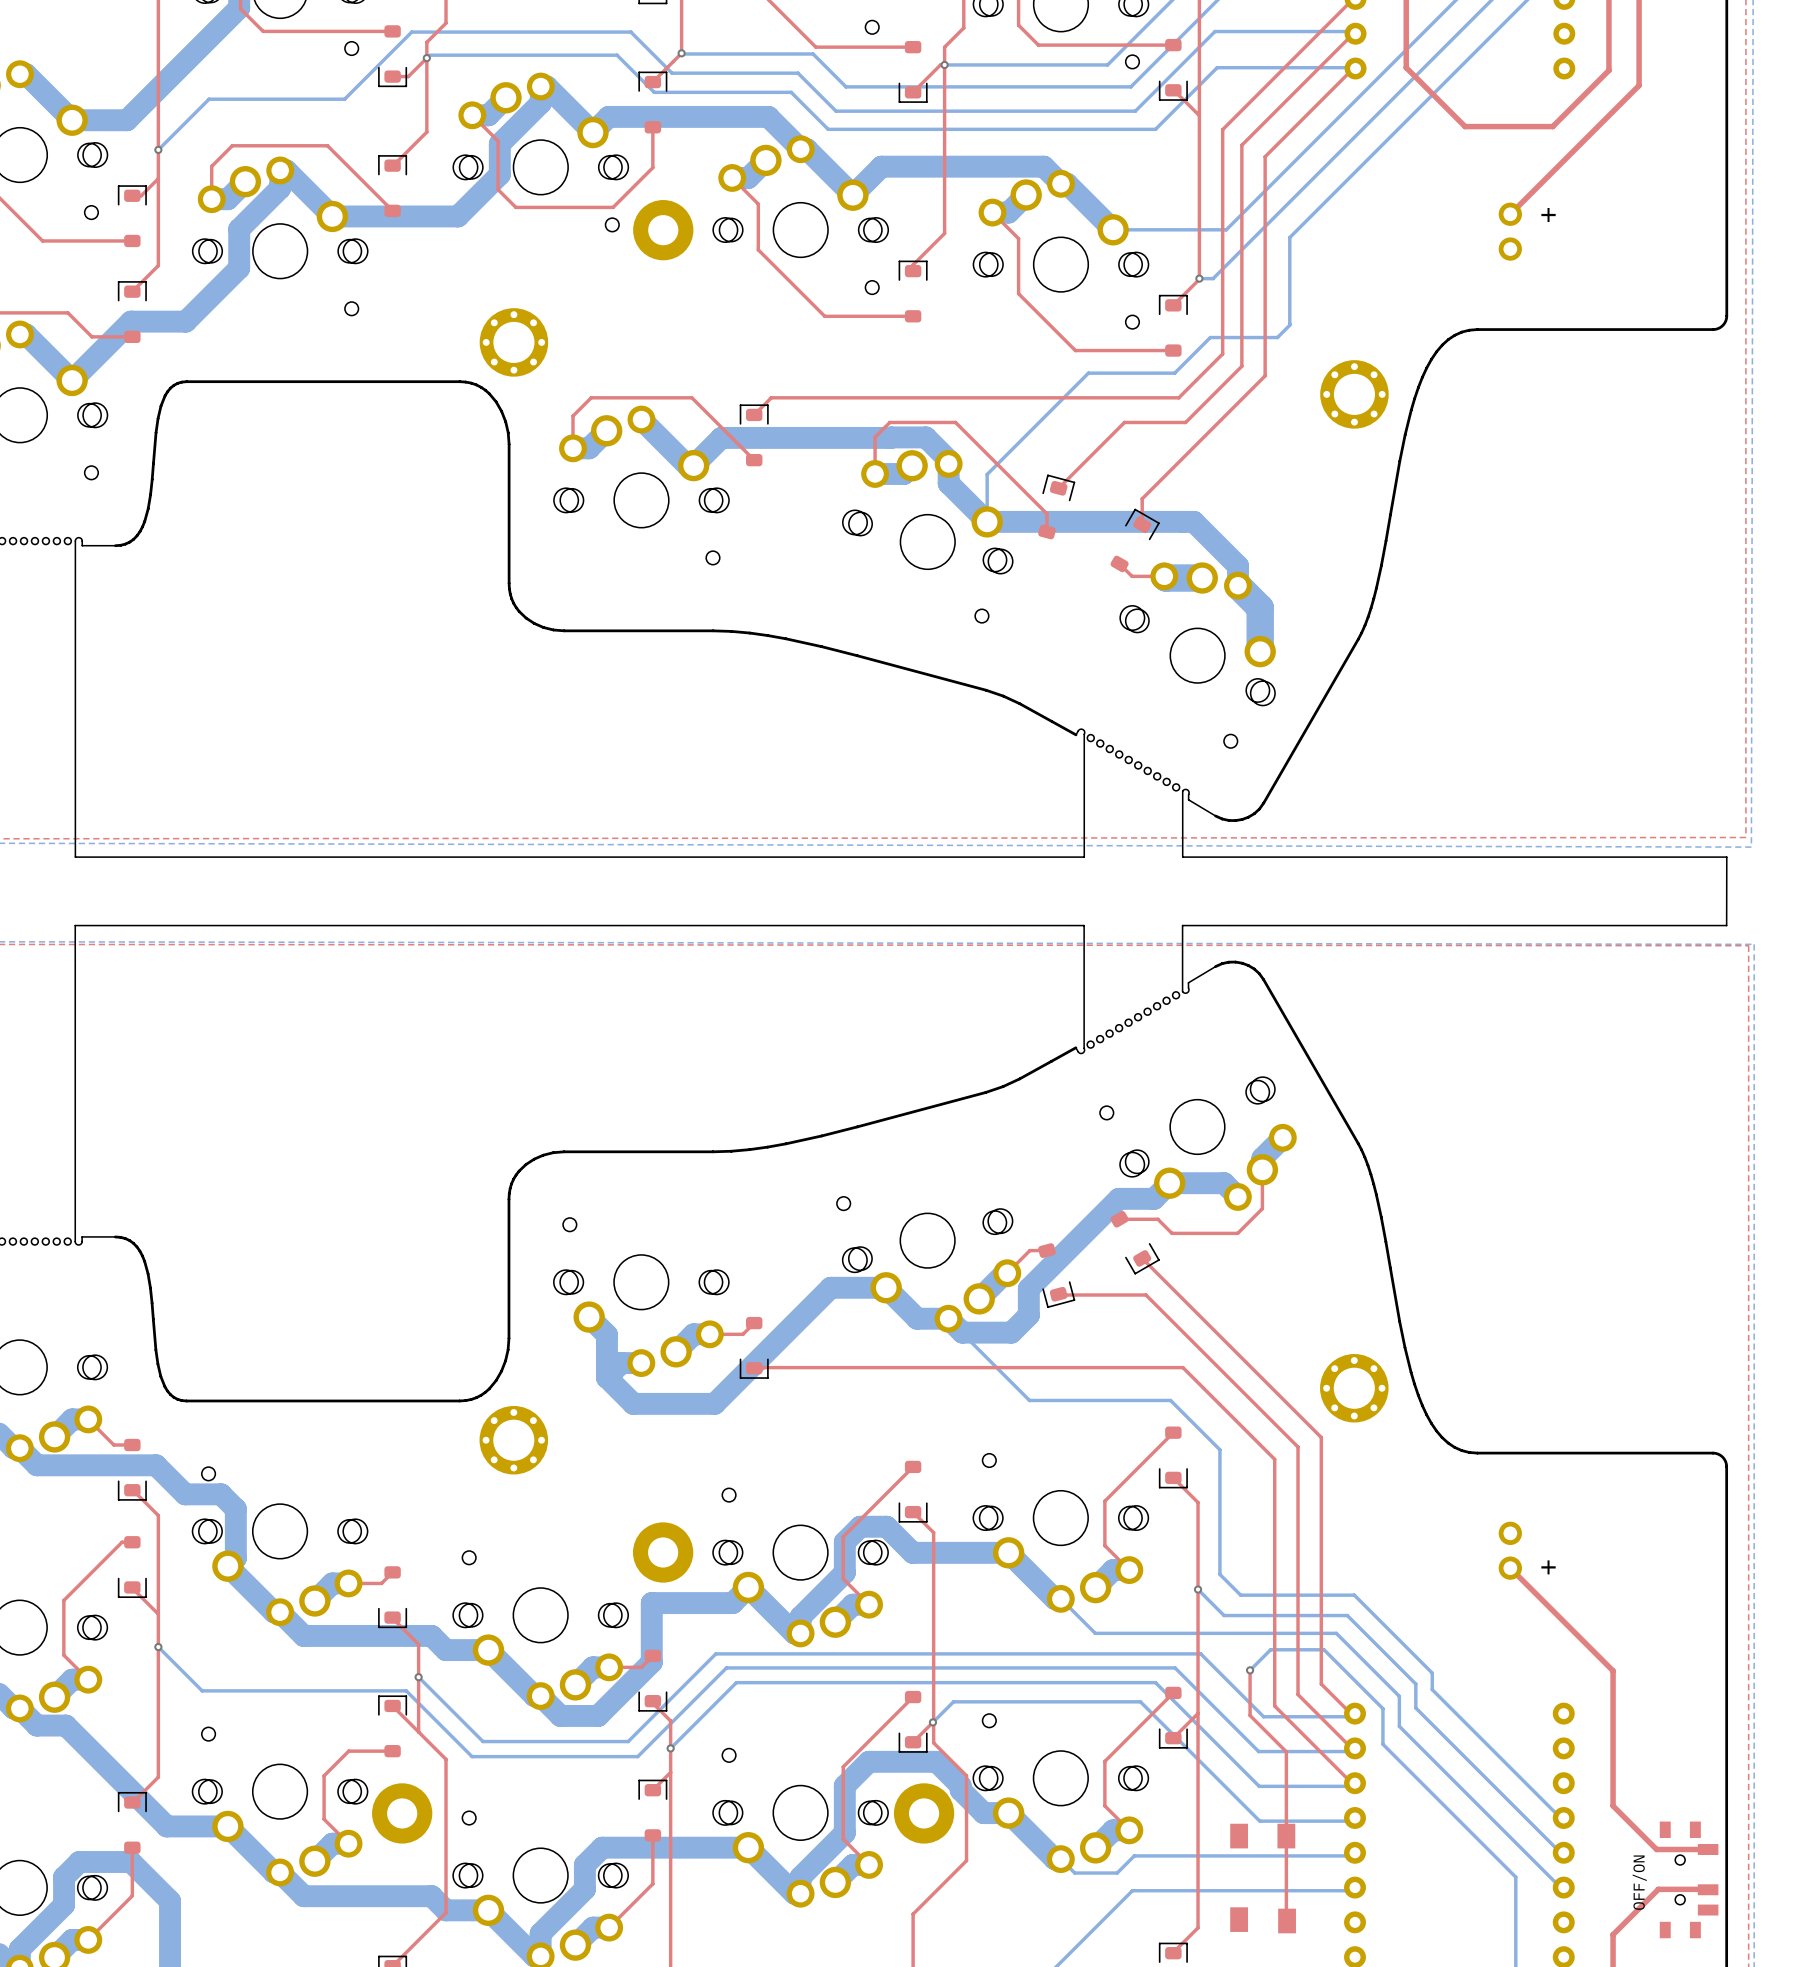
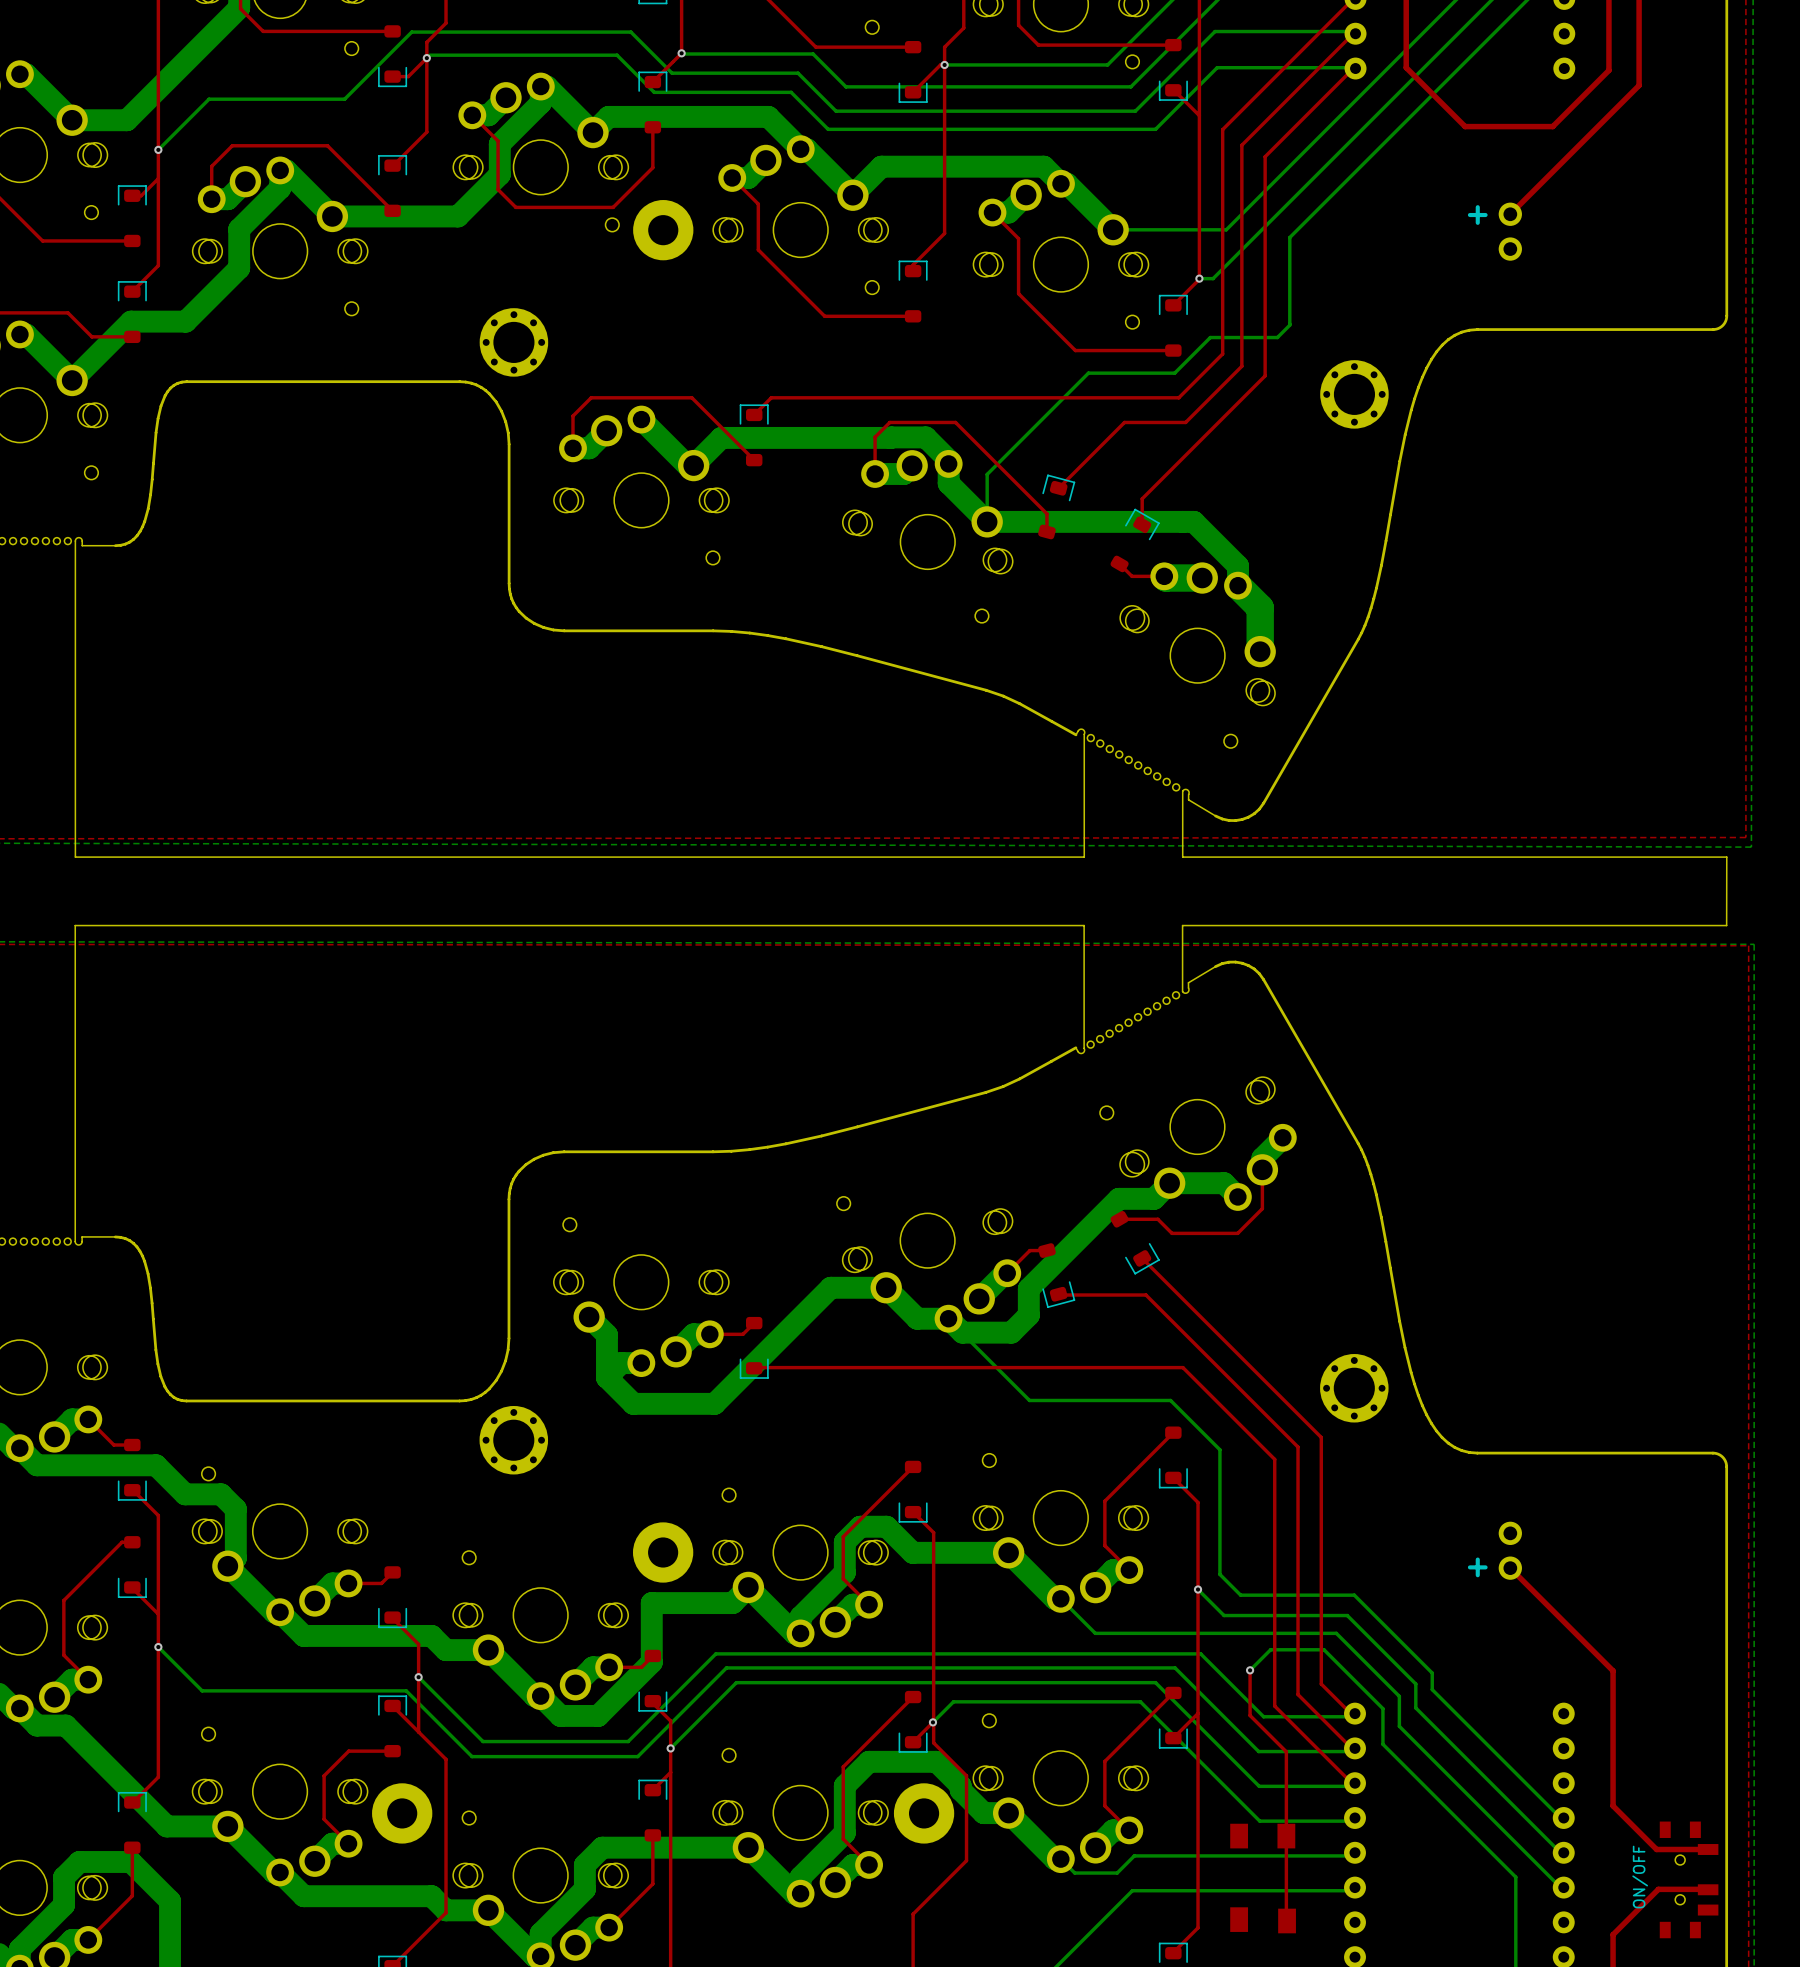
part text position: + (1548, 215) -> + (1477, 215)
part text position: + (1548, 1567) -> + (1477, 1567)
part text: OFF/ON (1639, 1882) -> ON/OFF (1640, 1877)

